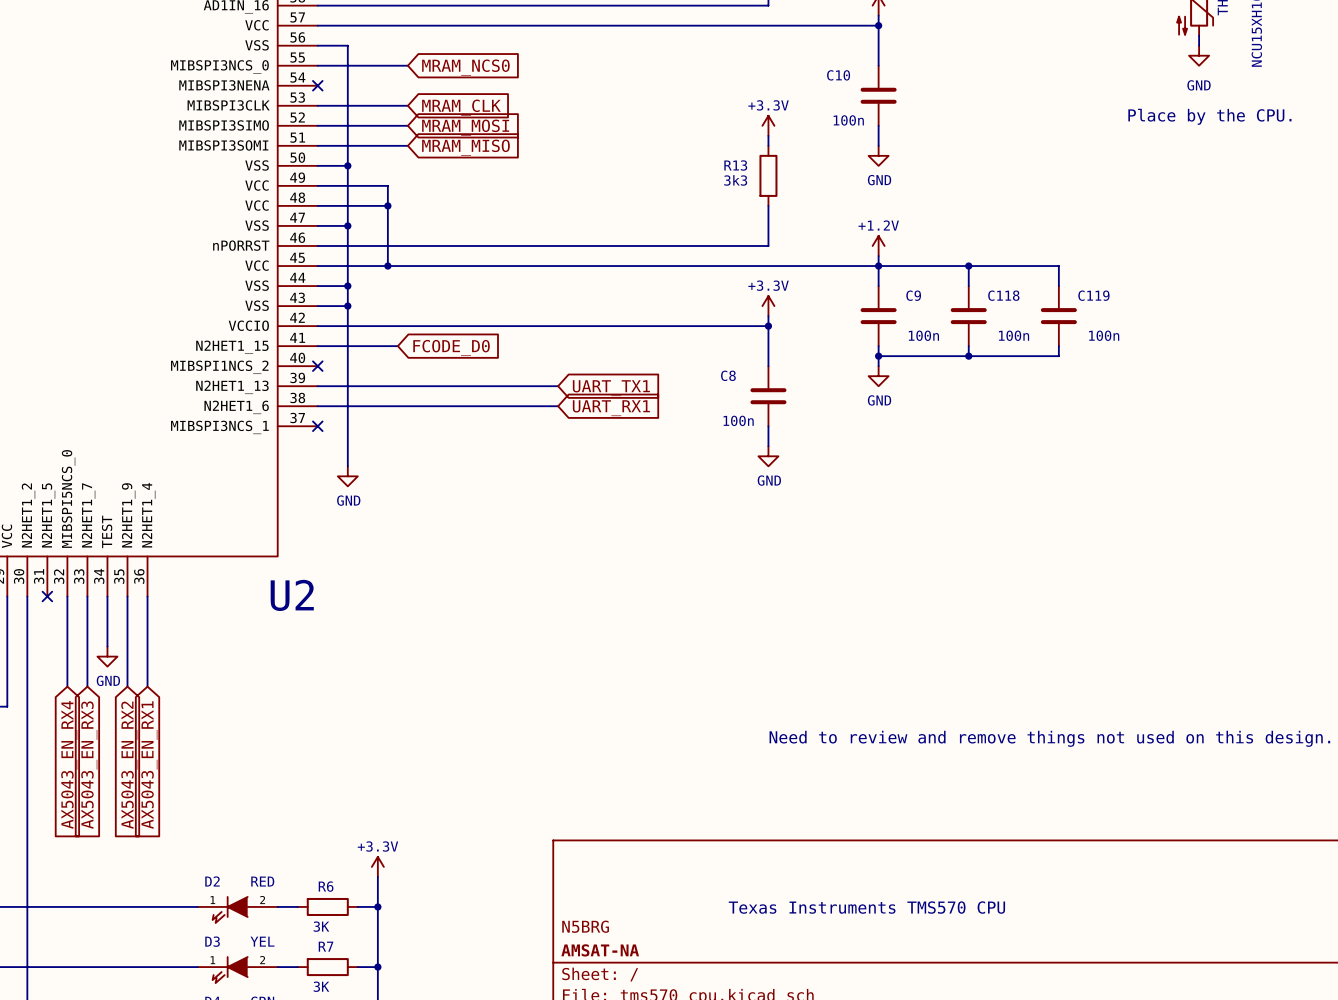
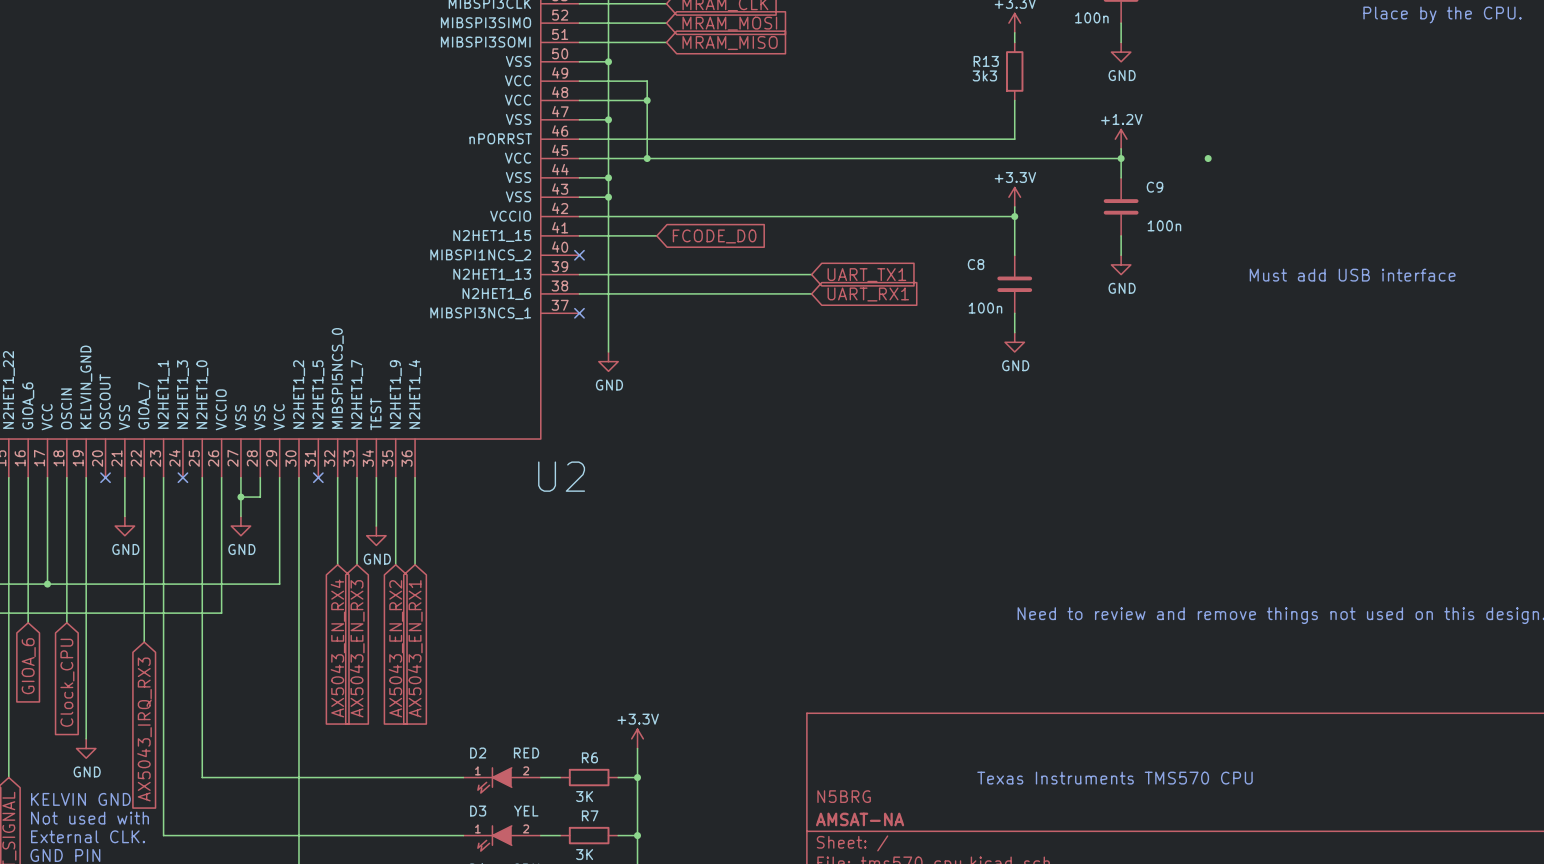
wire: (878, 266) (1058, 266) (1058, 286) -> none
wire: (968, 266) (968, 286) -> none
C118: 100n (968, 316) -> none
C119: 100n (1058, 316) -> none
wire: (968, 346) (968, 356) -> none
wire: (1058, 346) (1058, 356) (878, 356) -> none
junction: (878, 356) -> none
junction: (968, 356) -> none
text: none -> Must add USB interface (1352, 275)

